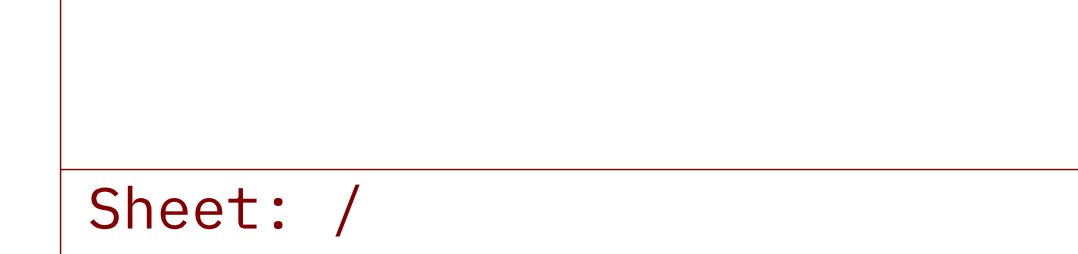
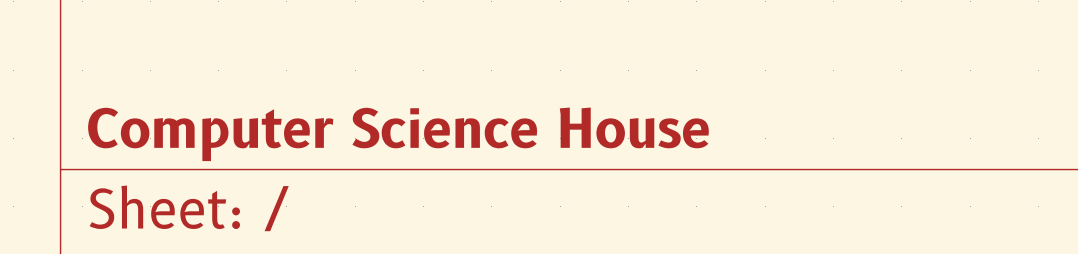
title block: none -> Computer Science House (398, 134)

